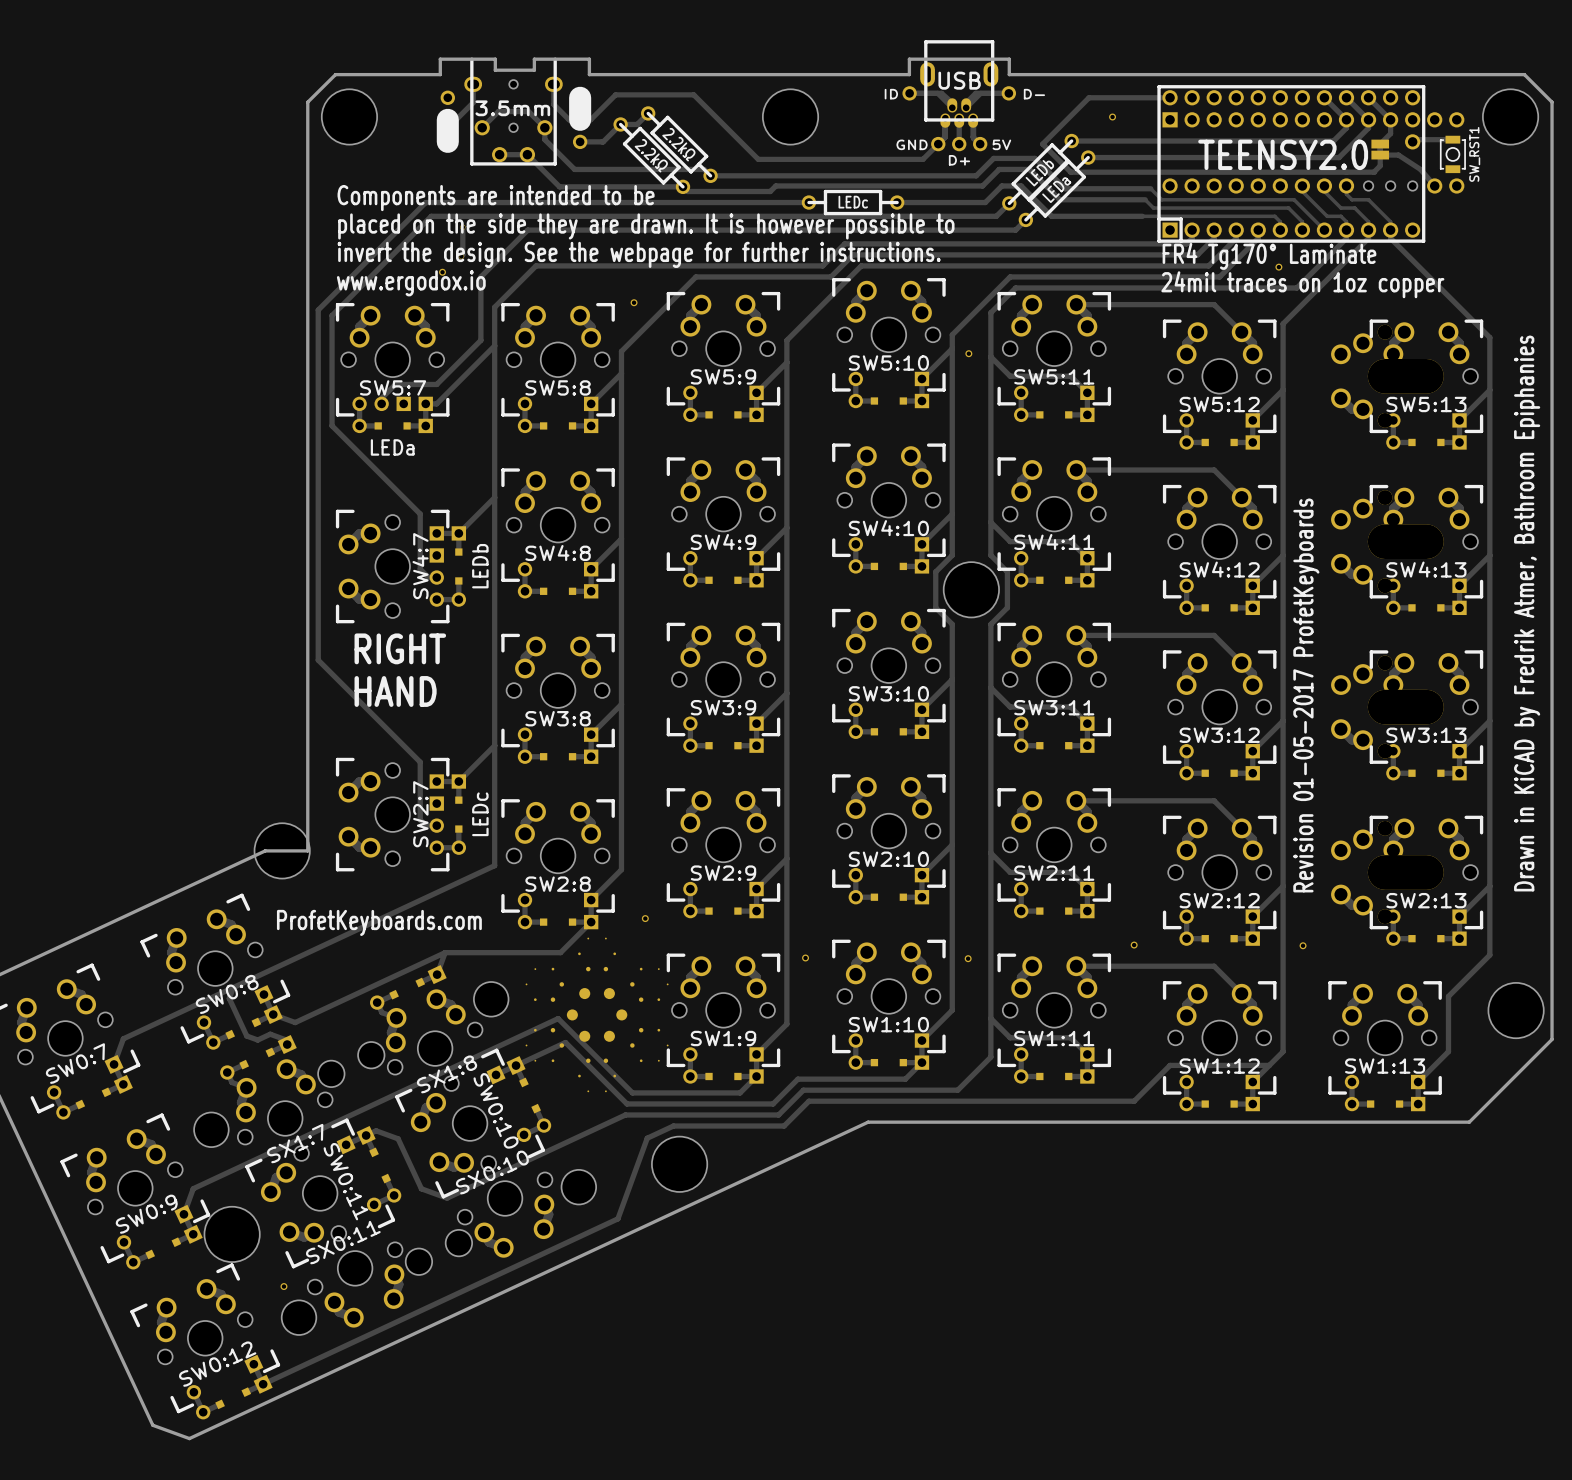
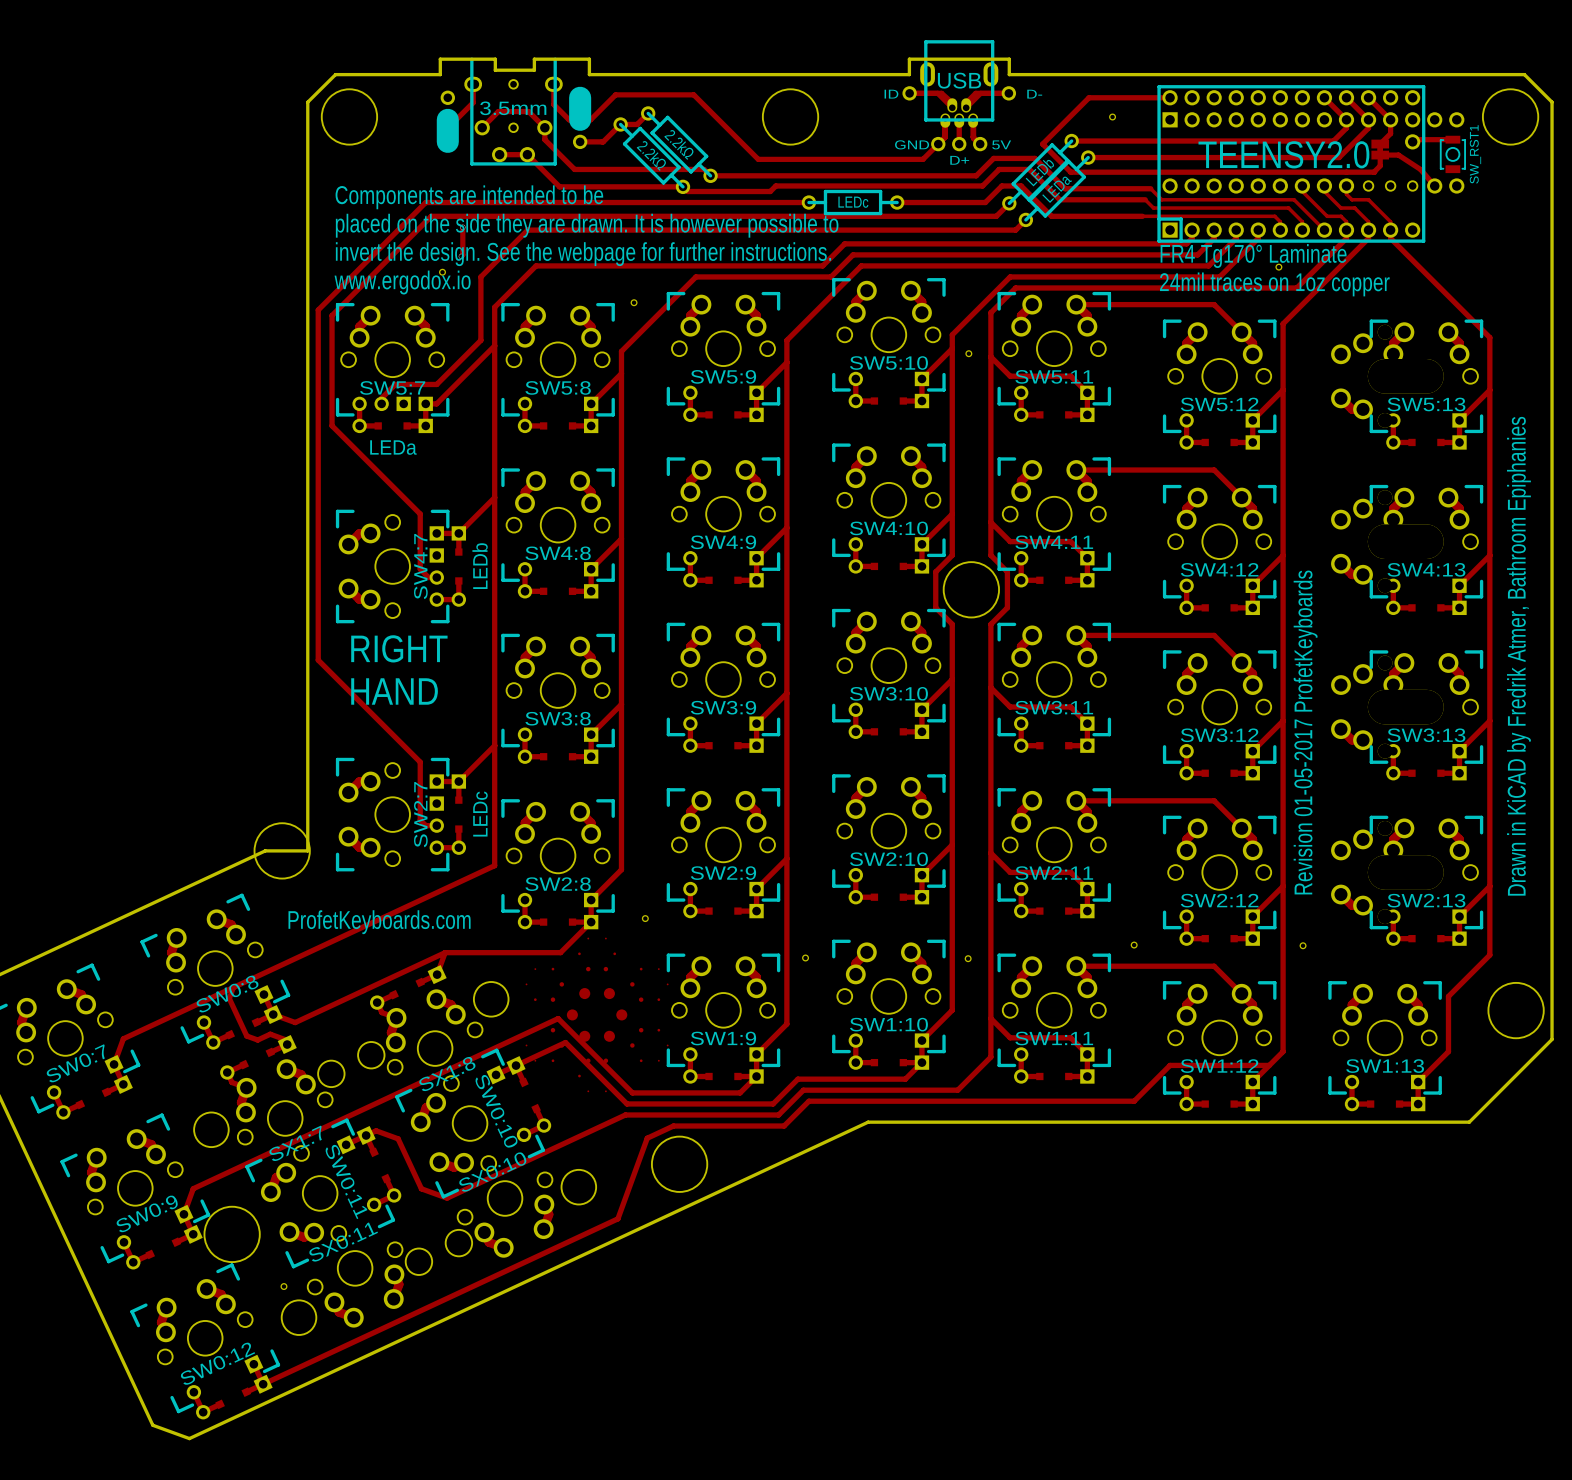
text position: Drawn in KiCAD by Fredrik Atmer, Bathroom Epiphanies (1527, 613) -> Drawn in KiCAD by Fredrik Atmer, Bathroom Epiphanies (1518, 656)

